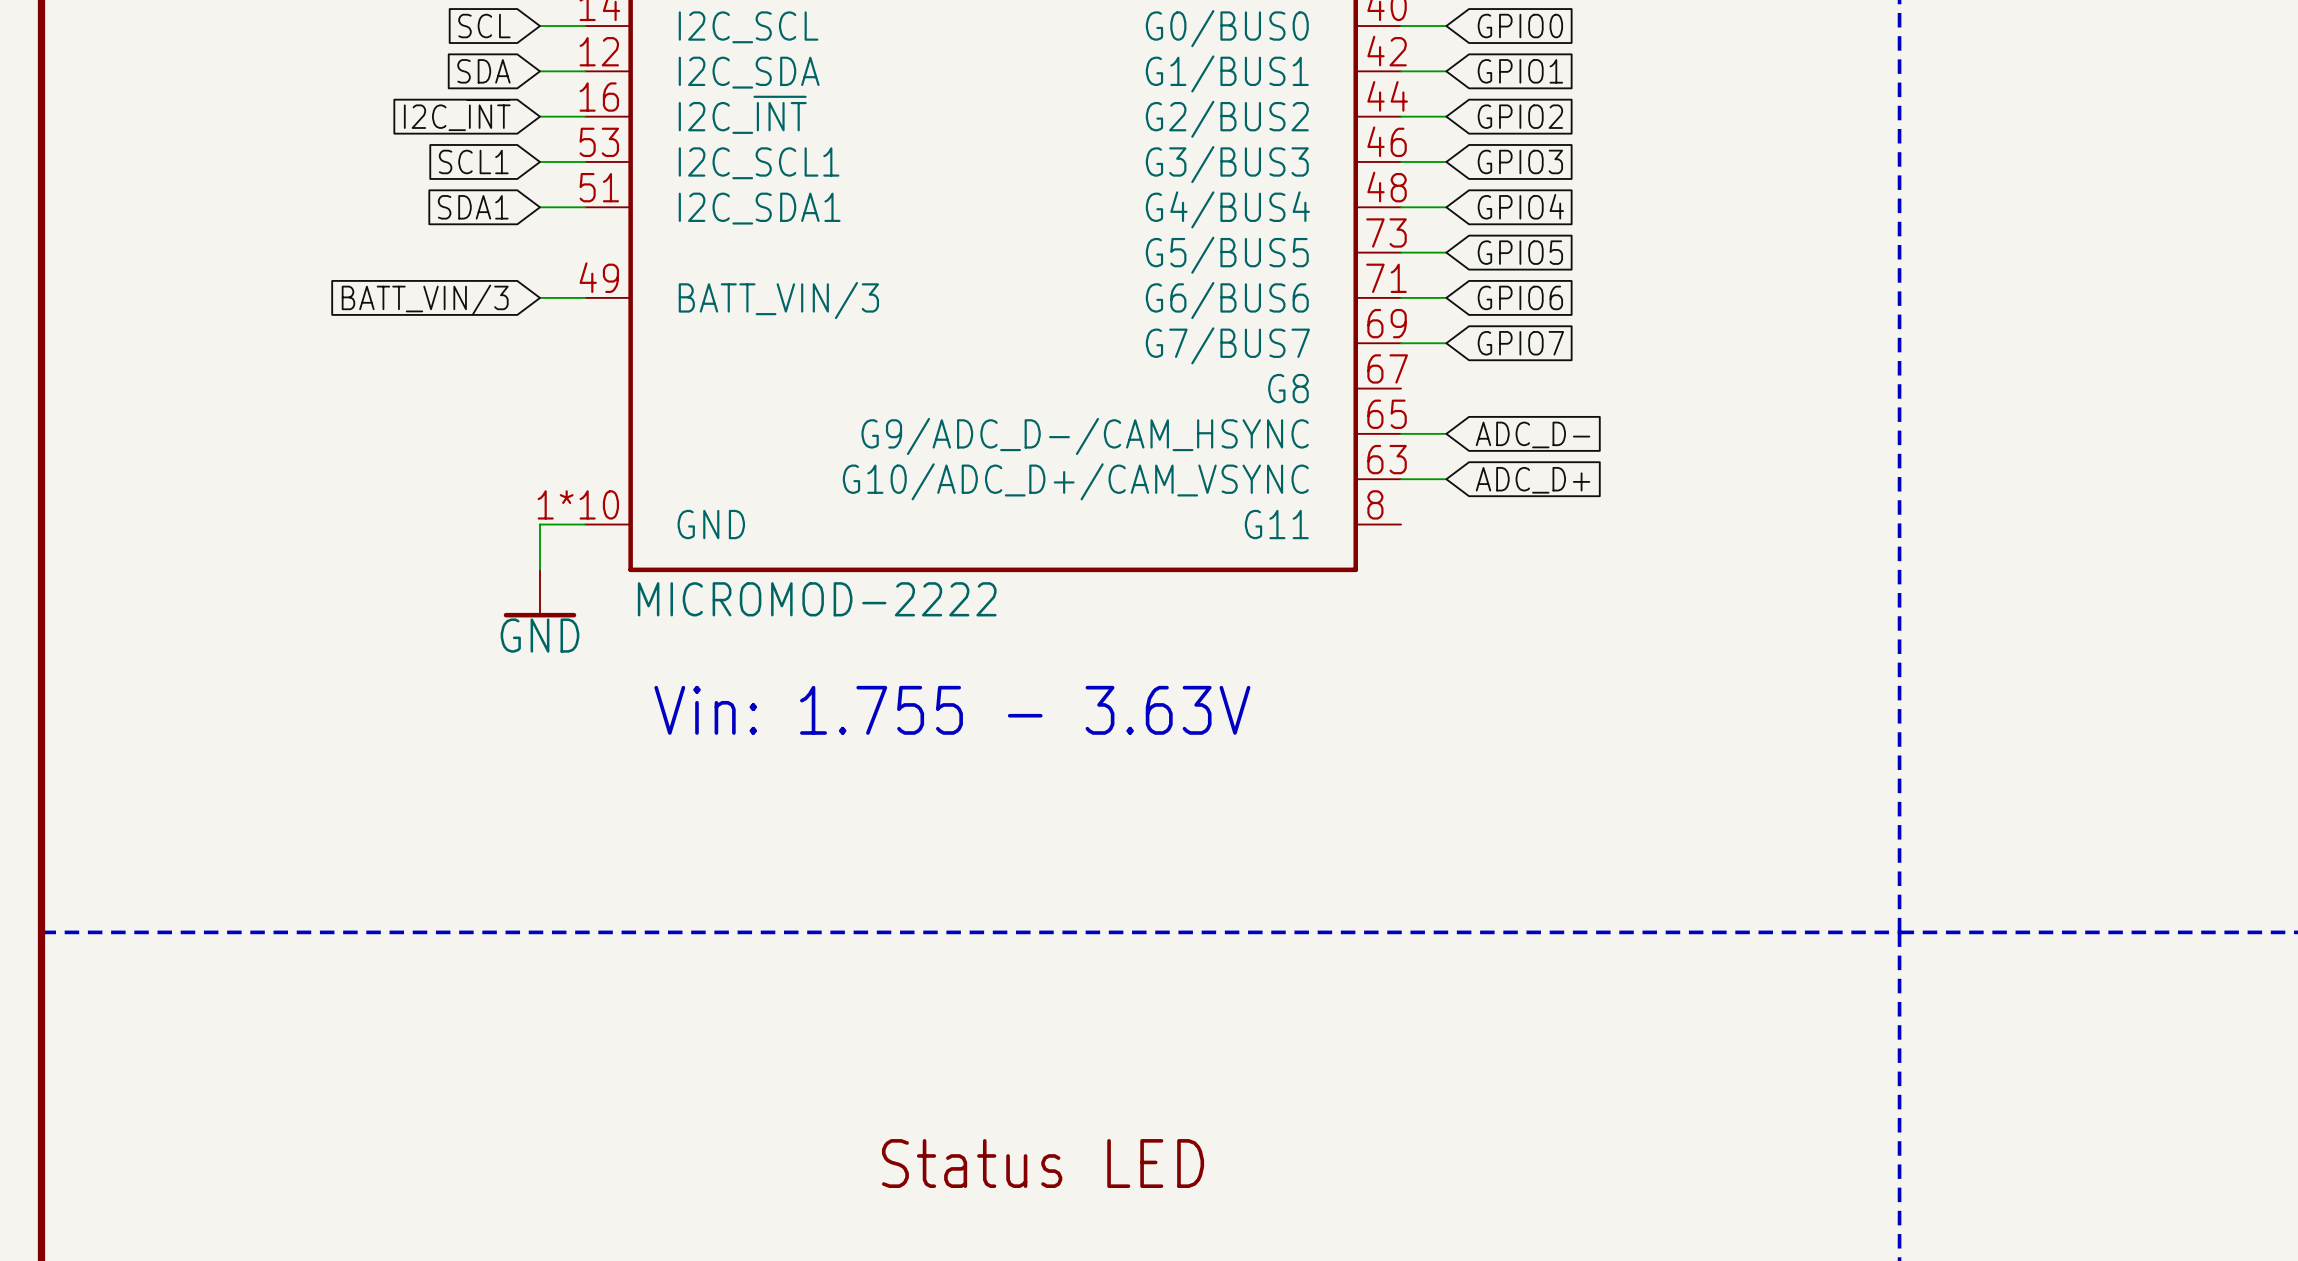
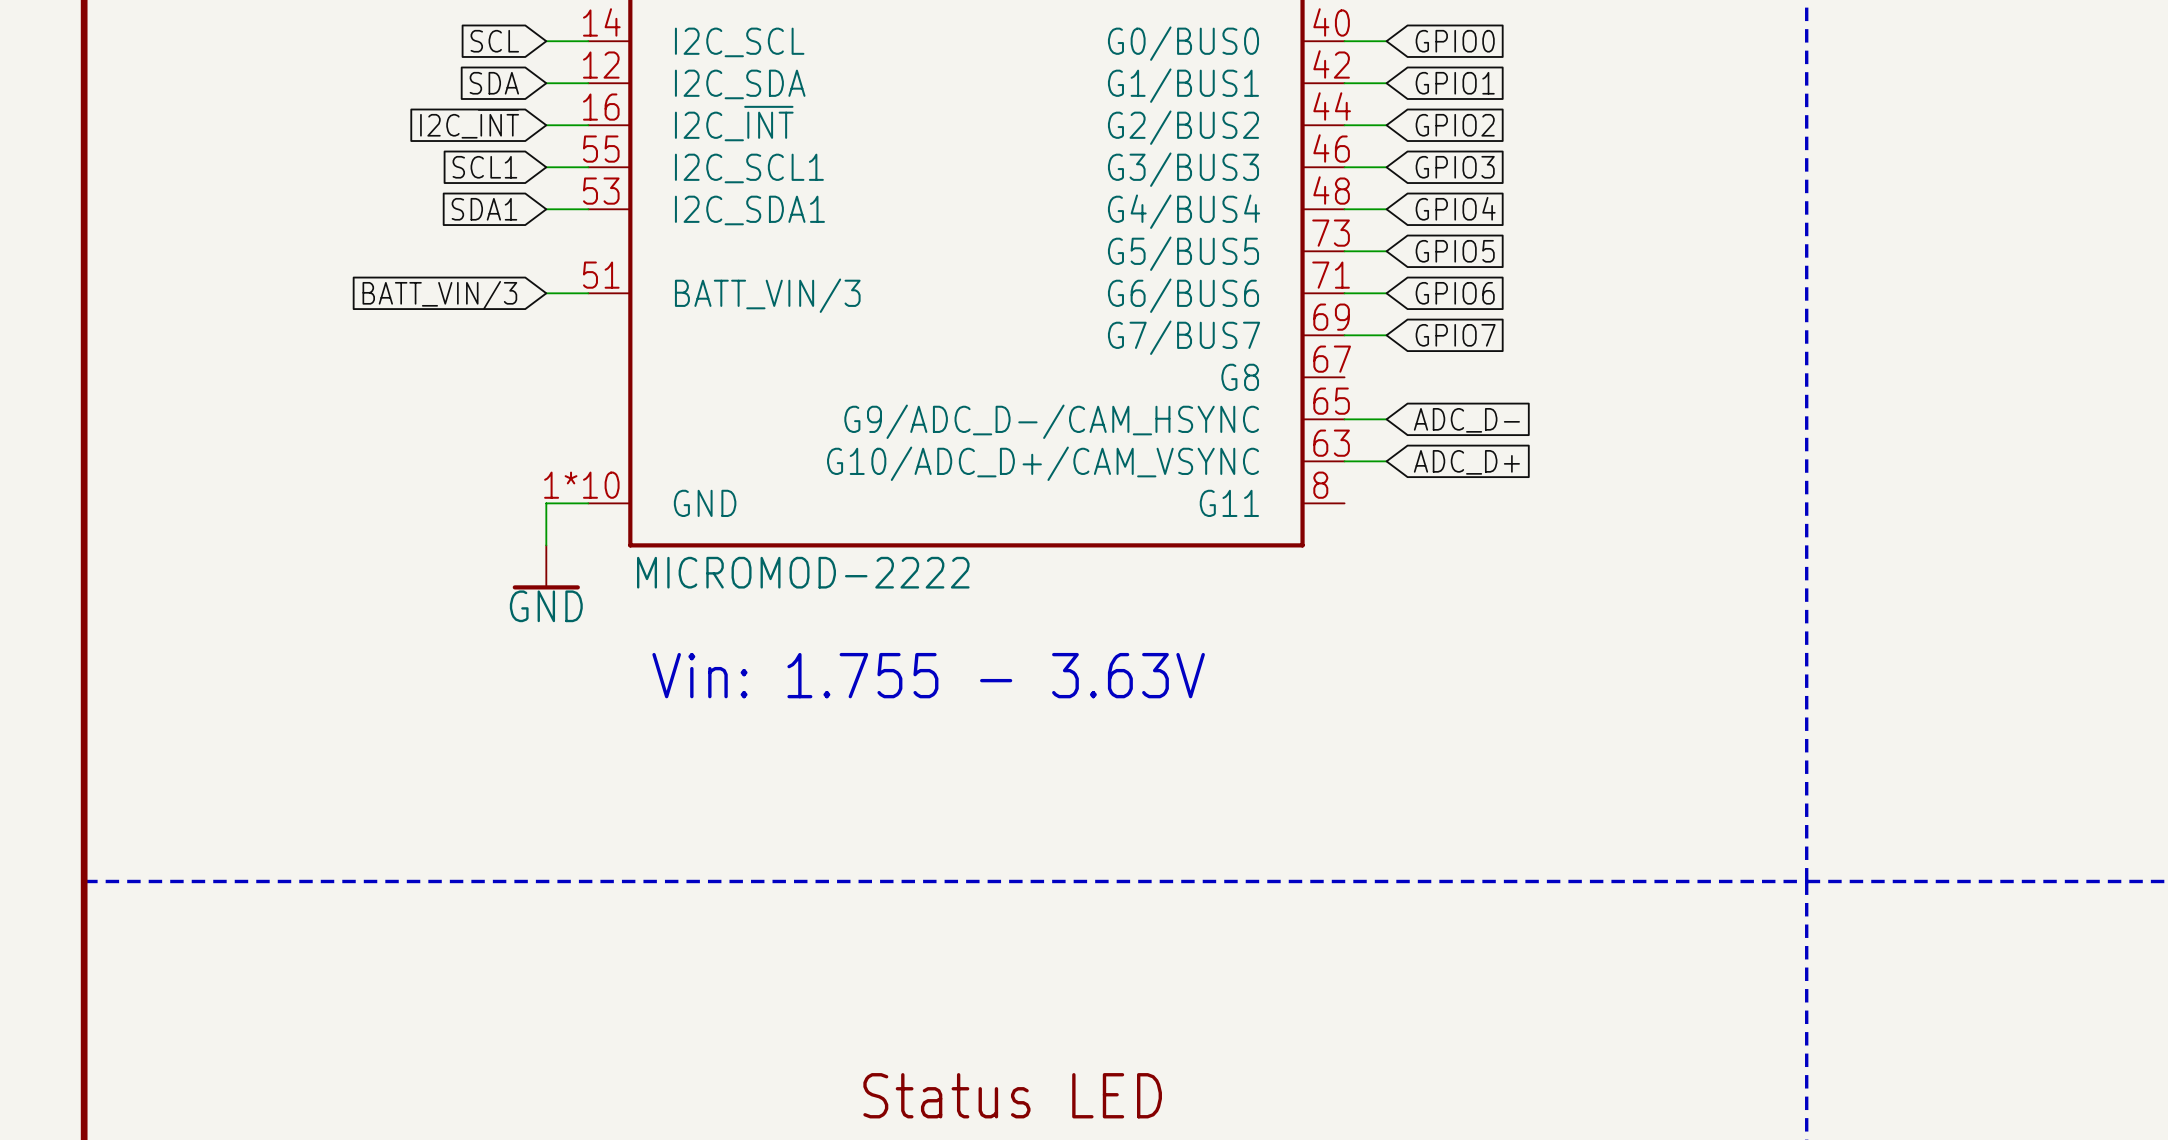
part pin number: 53 (599, 142) -> 55 (601, 149)
part pin number: 51 (599, 187) -> 53 (601, 191)
part pin number: 49 (599, 277) -> 51 (601, 275)

